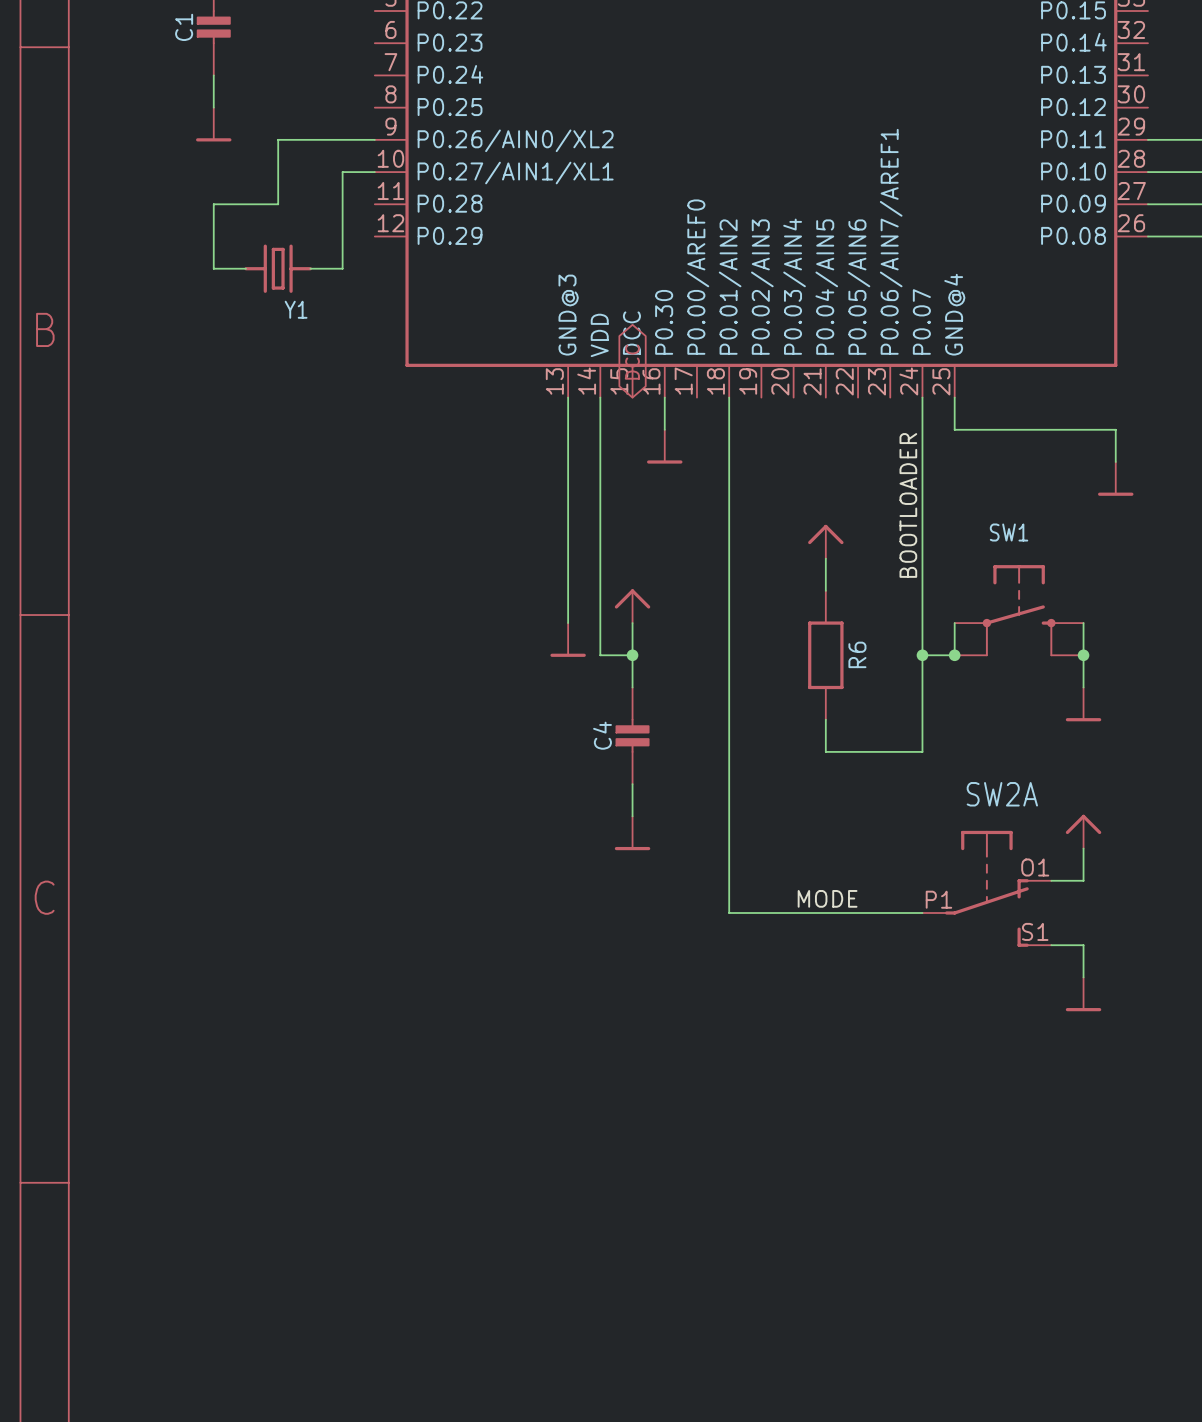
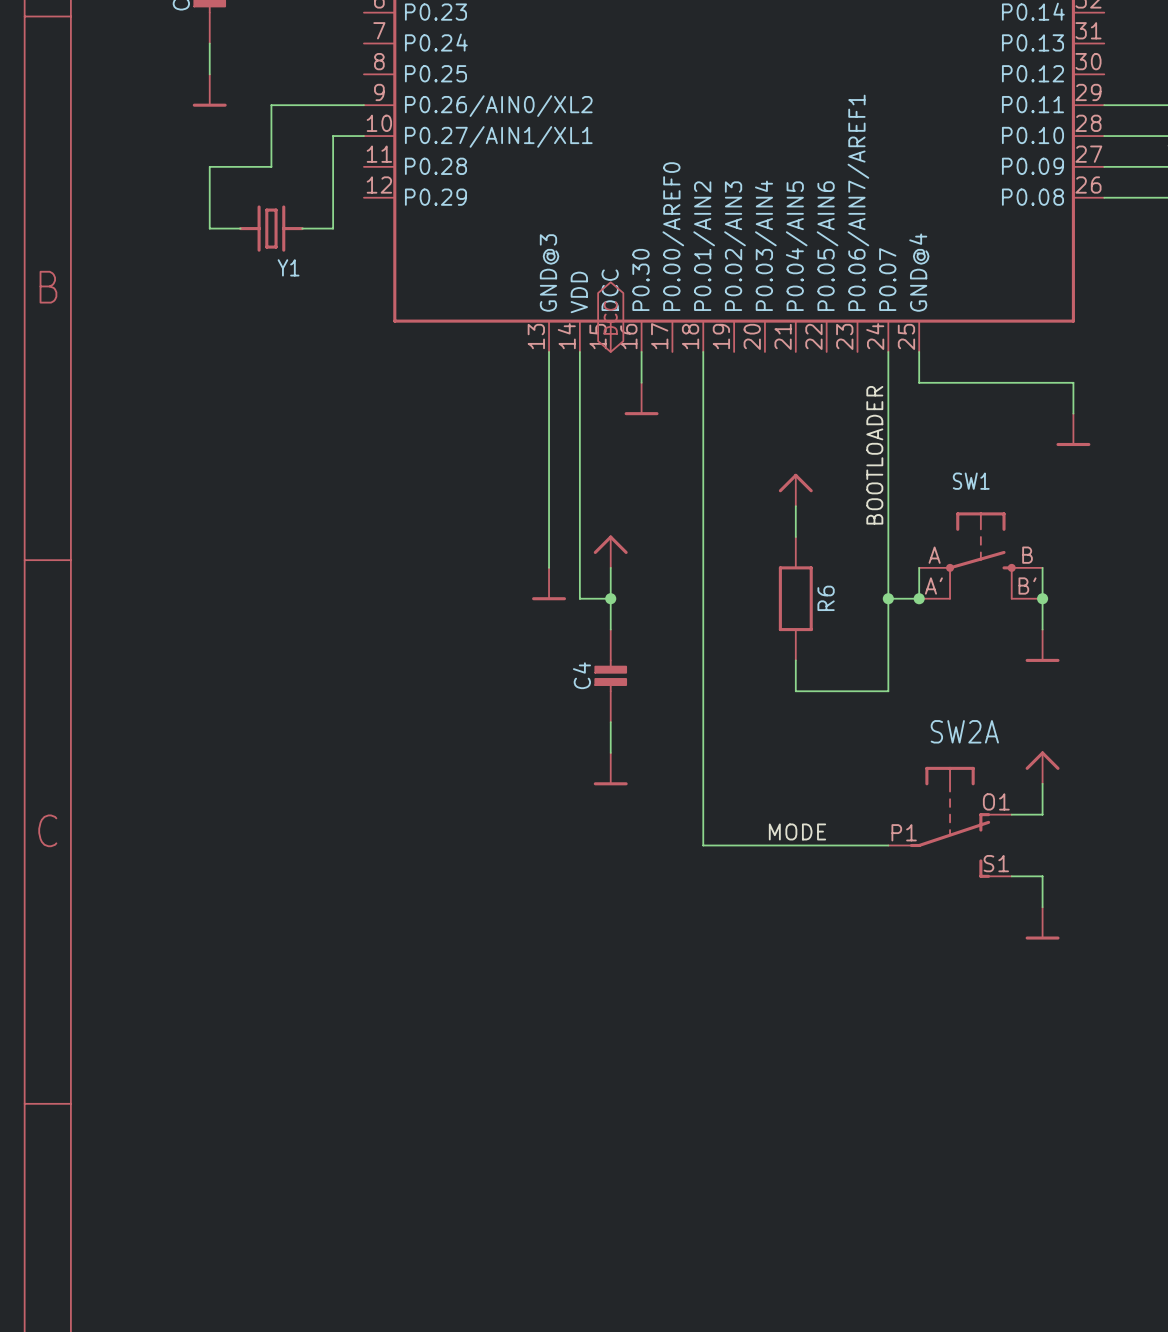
SW1 pin number: none -> A (934, 555)
SW1 pin number: none -> B (1027, 555)
SW1 pin number: none -> A' (933, 586)
SW1 pin number: none -> B' (1027, 586)

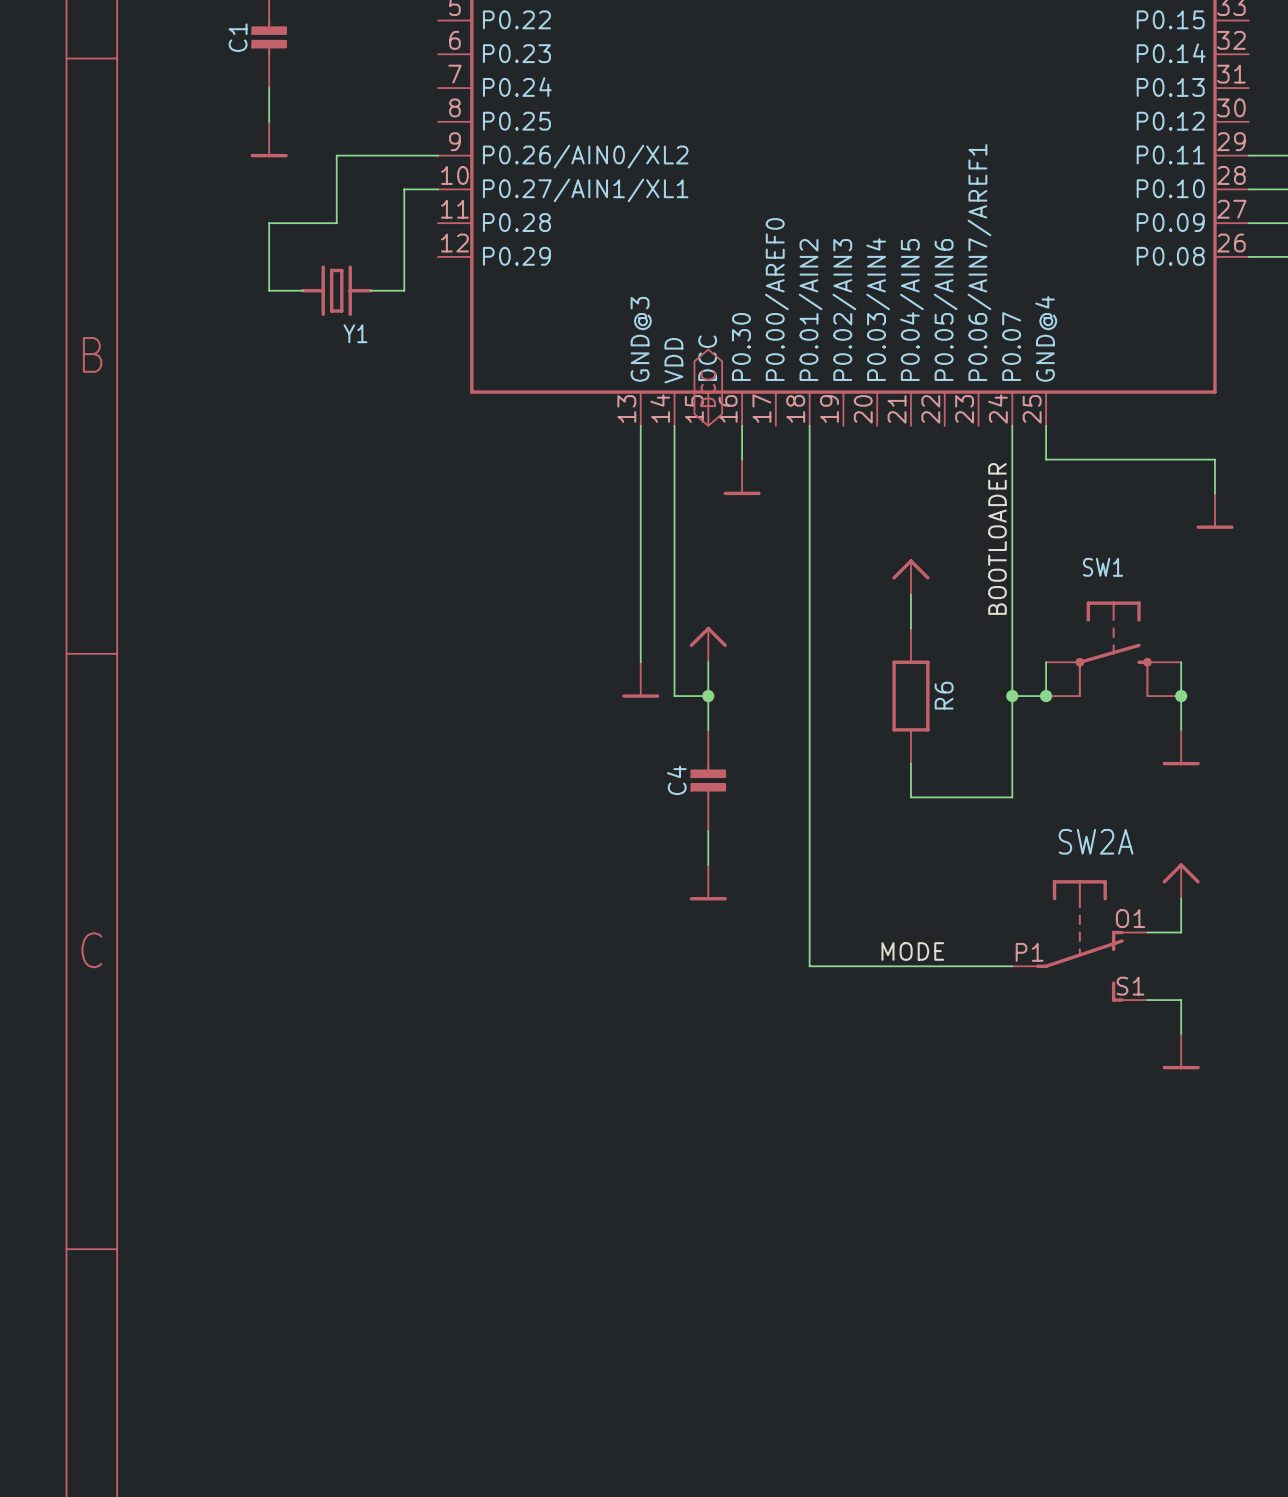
SW1 pin number: A (934, 555) -> none
SW1 pin number: B (1027, 555) -> none
SW1 pin number: A' (933, 586) -> none
SW1 pin number: B' (1027, 586) -> none

